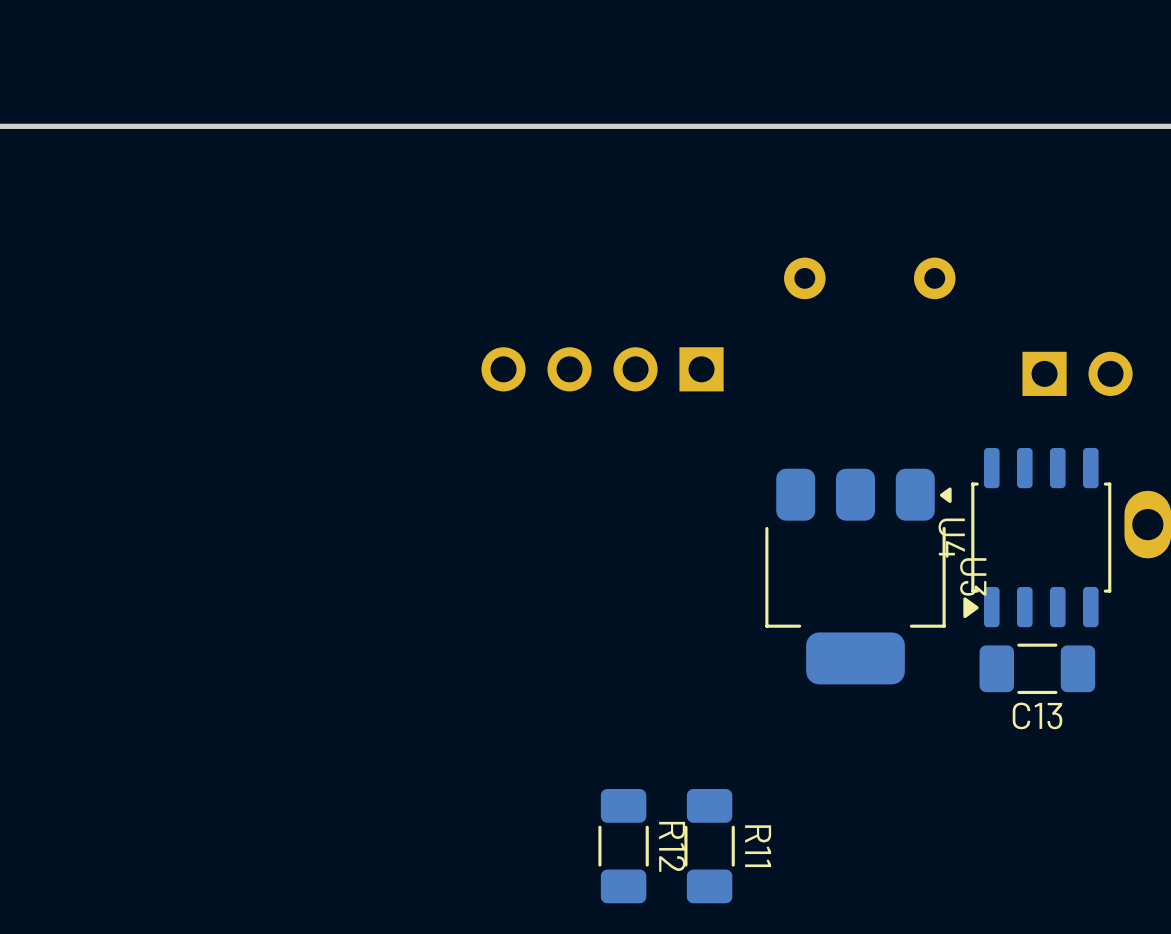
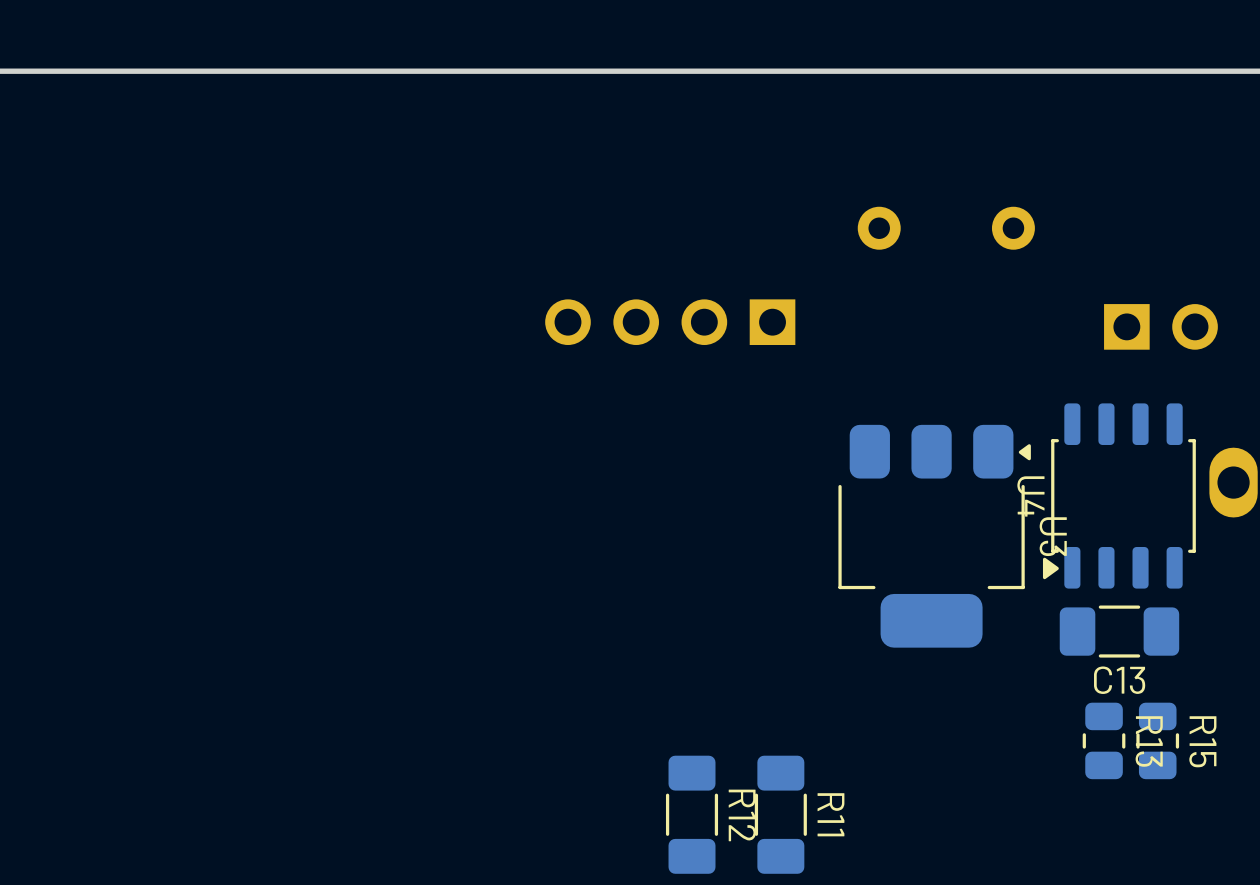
R13: none -> (1104, 740)
R15: none -> (1157, 740)

